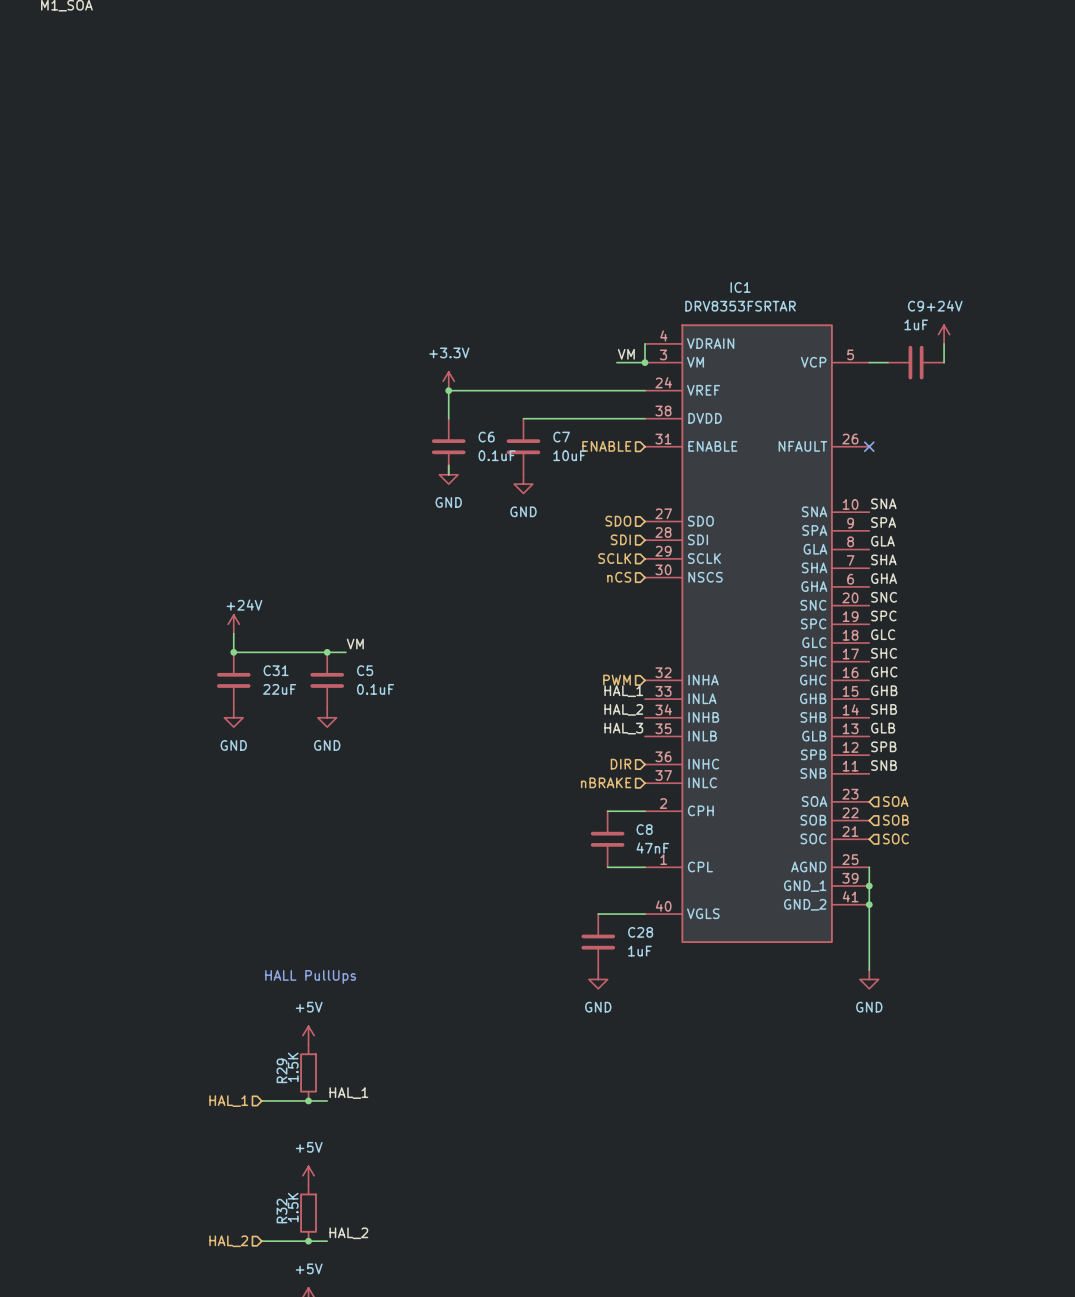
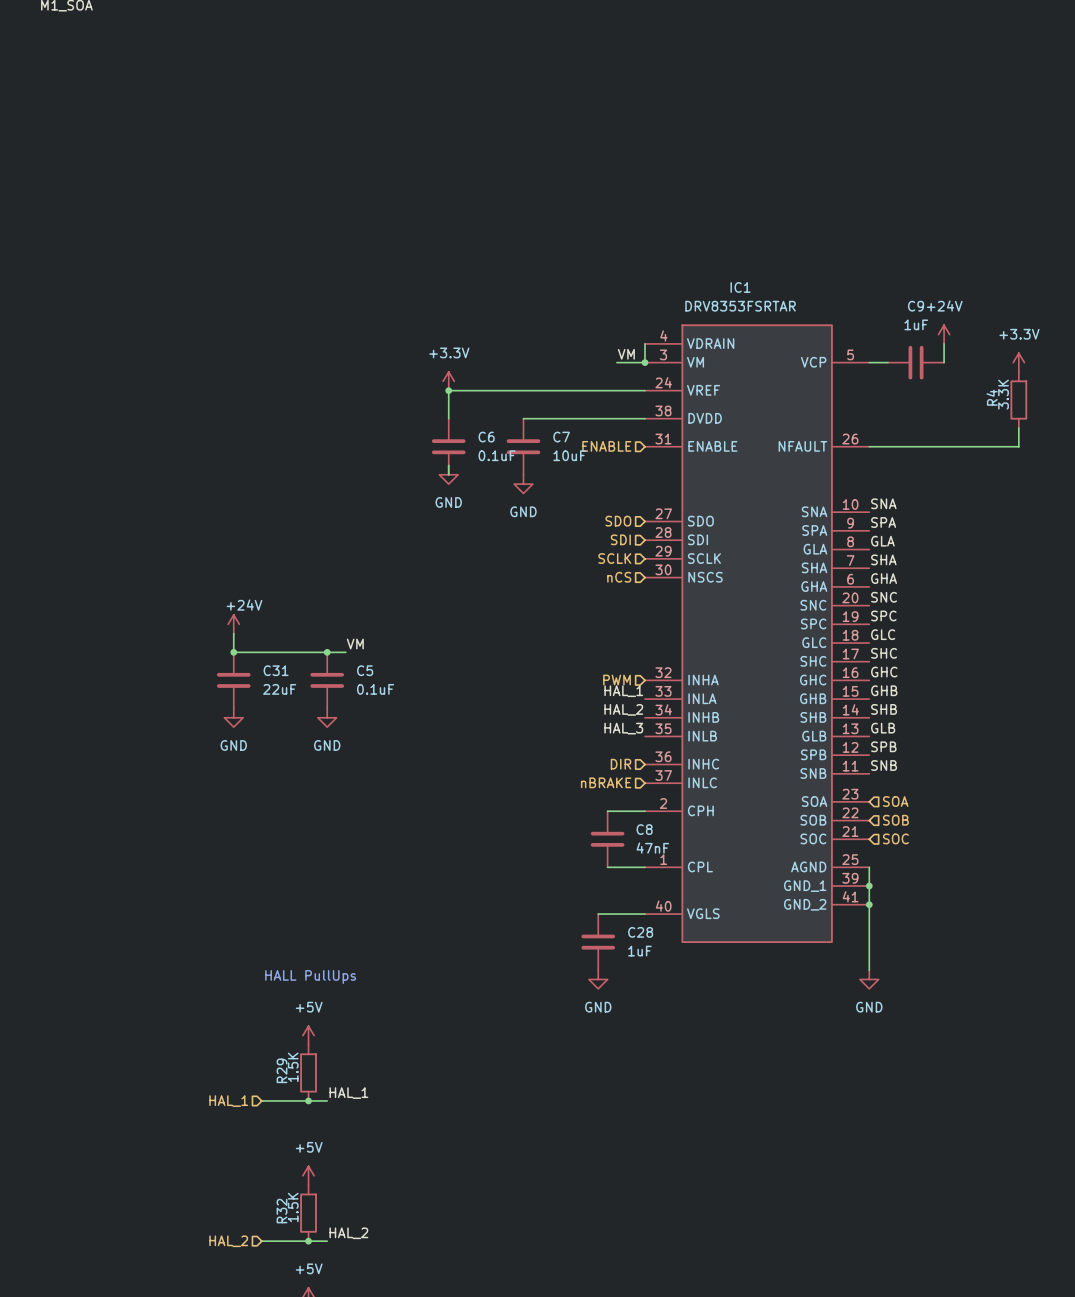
power symbol: none -> +3.3V (1018, 362)
R4: none -> 3.3K (1018, 400)
wire: none -> (1018, 428) (1018, 446) (869, 446)
no-connect mark: (869, 446) -> none

